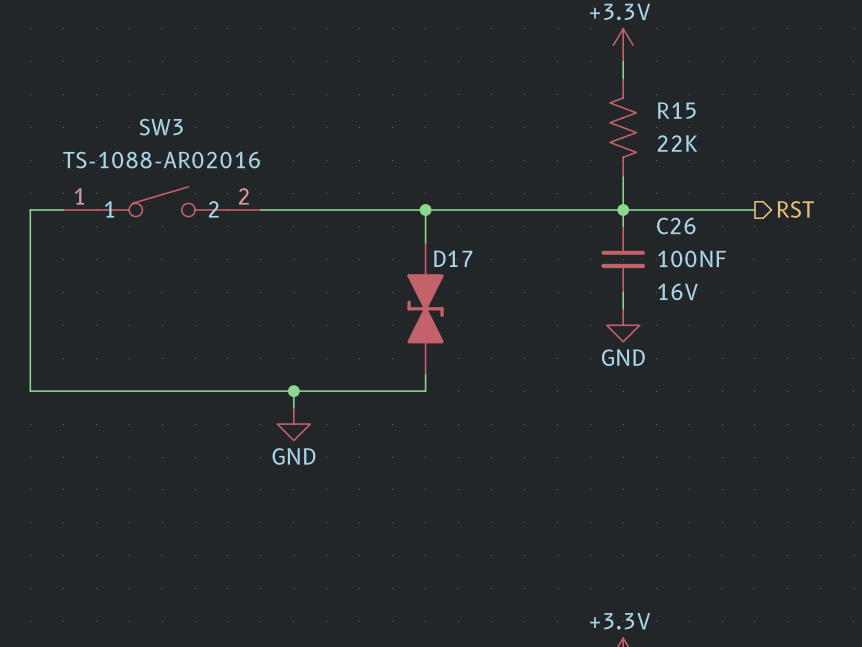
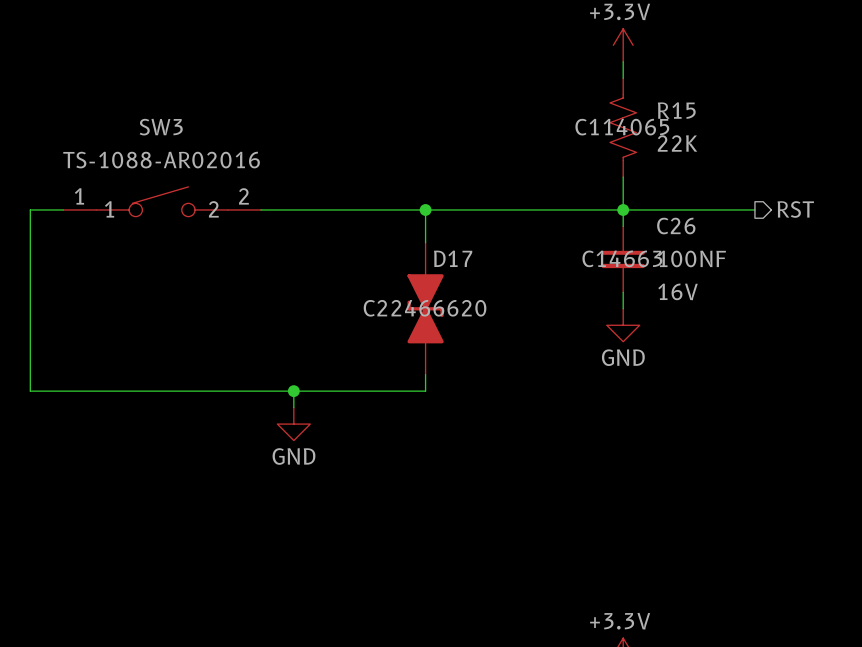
R15 text: none -> C114065 (622, 127)
C26 text: none -> C14663 (622, 258)
D17 text: none -> C22466620 (425, 308)

